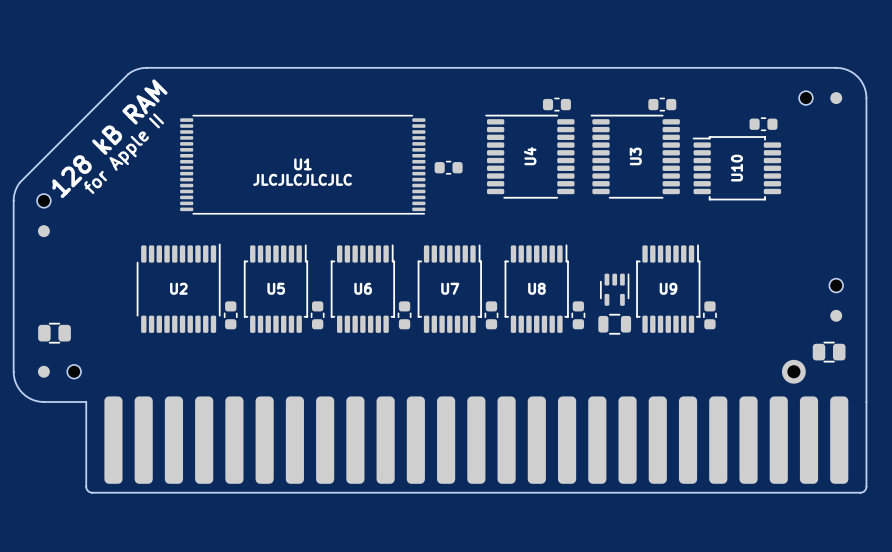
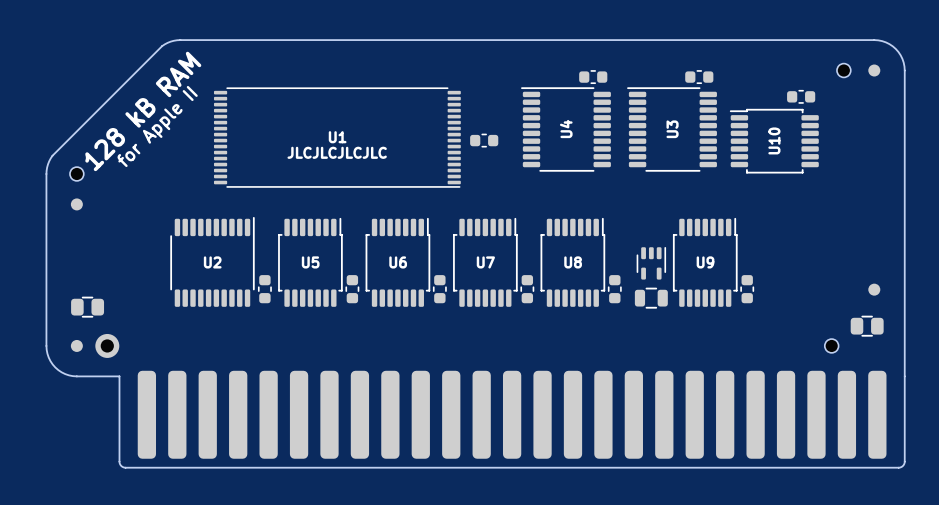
part: (836, 285) -> none
part footprint: [781, 359, 806, 384] -> [824, 339, 839, 353]
part footprint: [67, 364, 82, 379] -> [95, 333, 120, 358]

